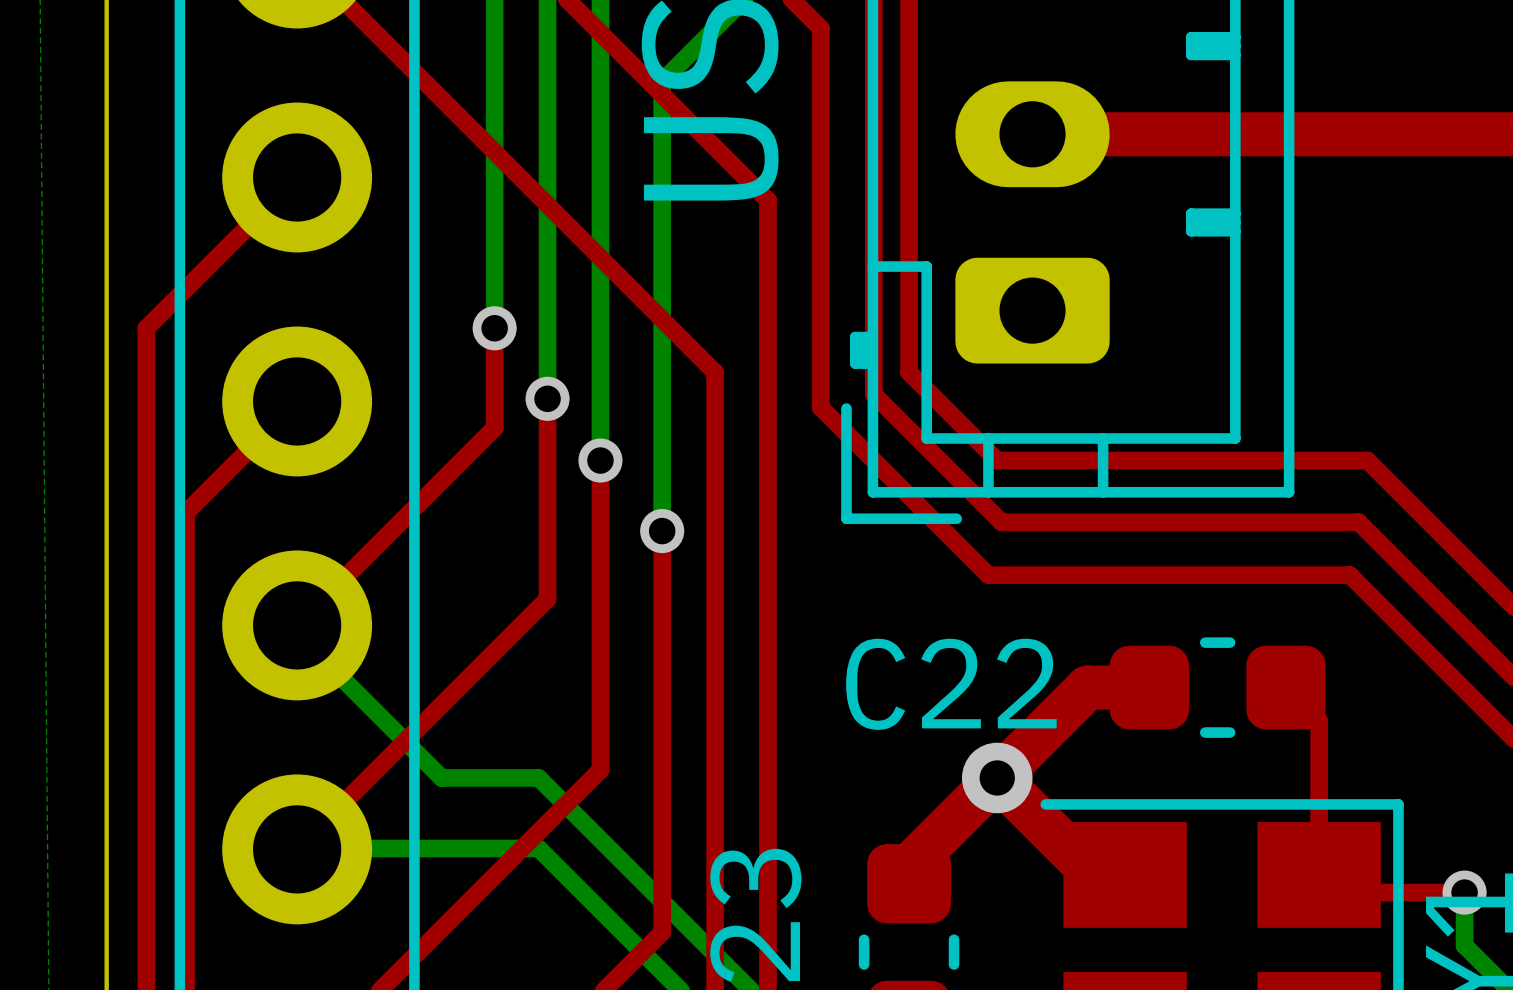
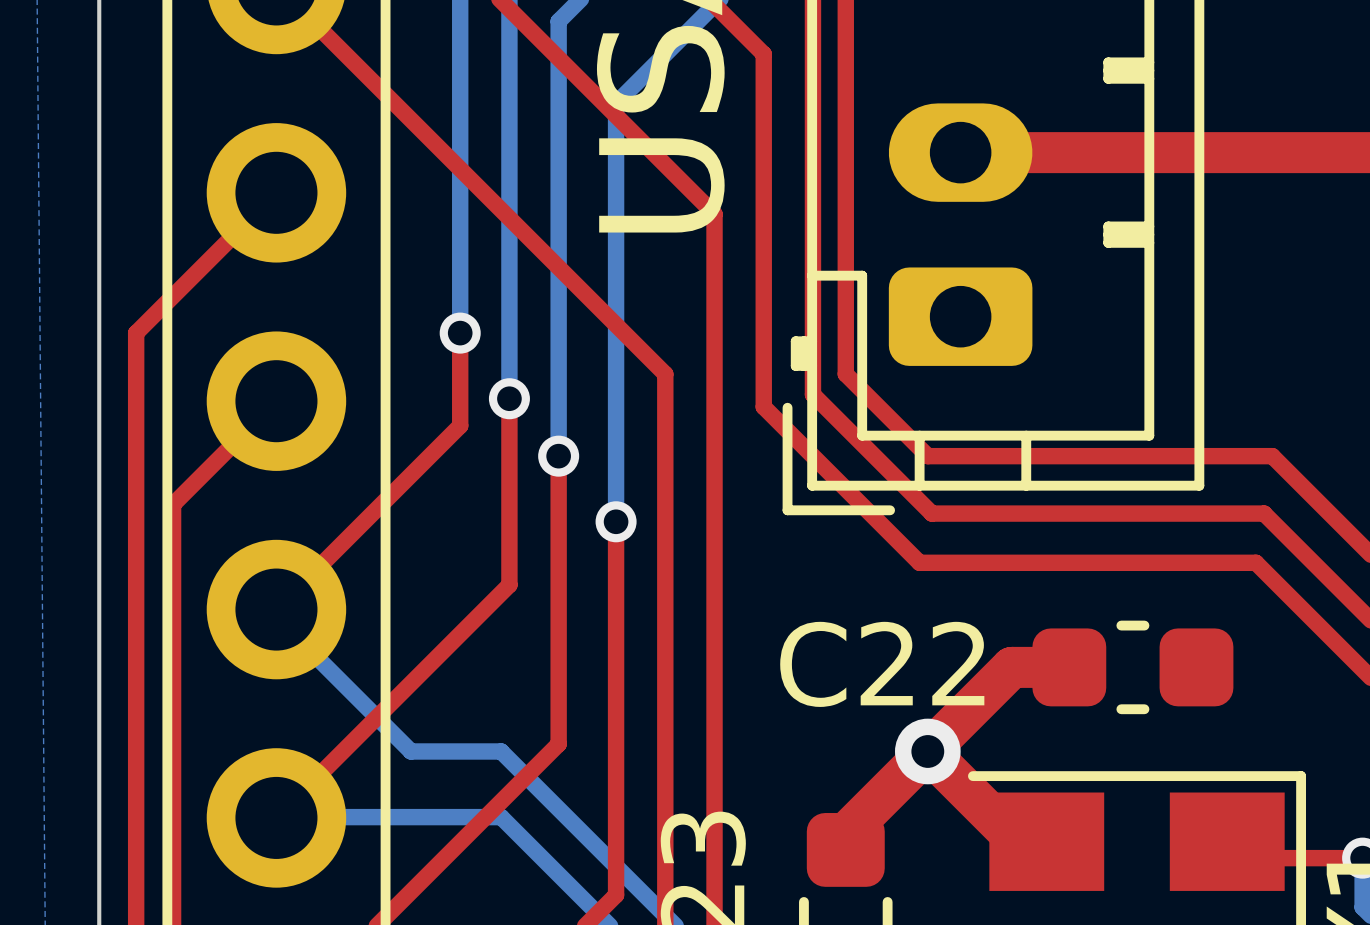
top track: (1286, 687) (1319, 720) (1319, 874) -> none

